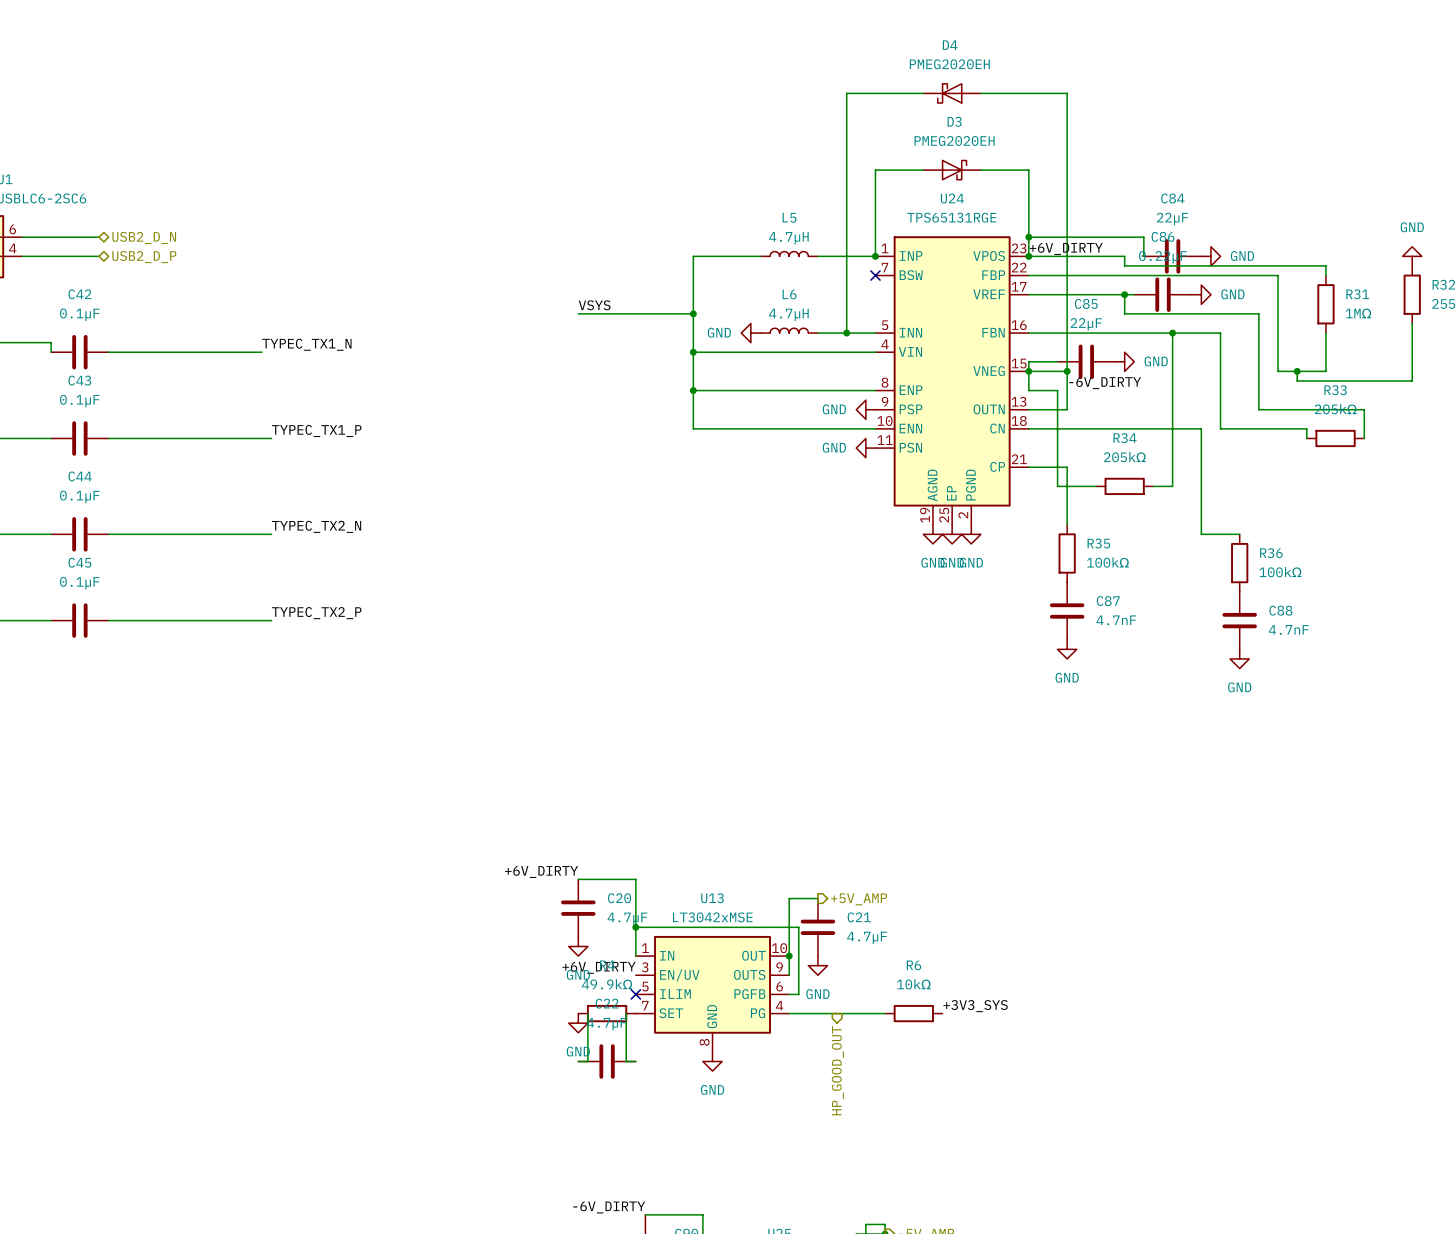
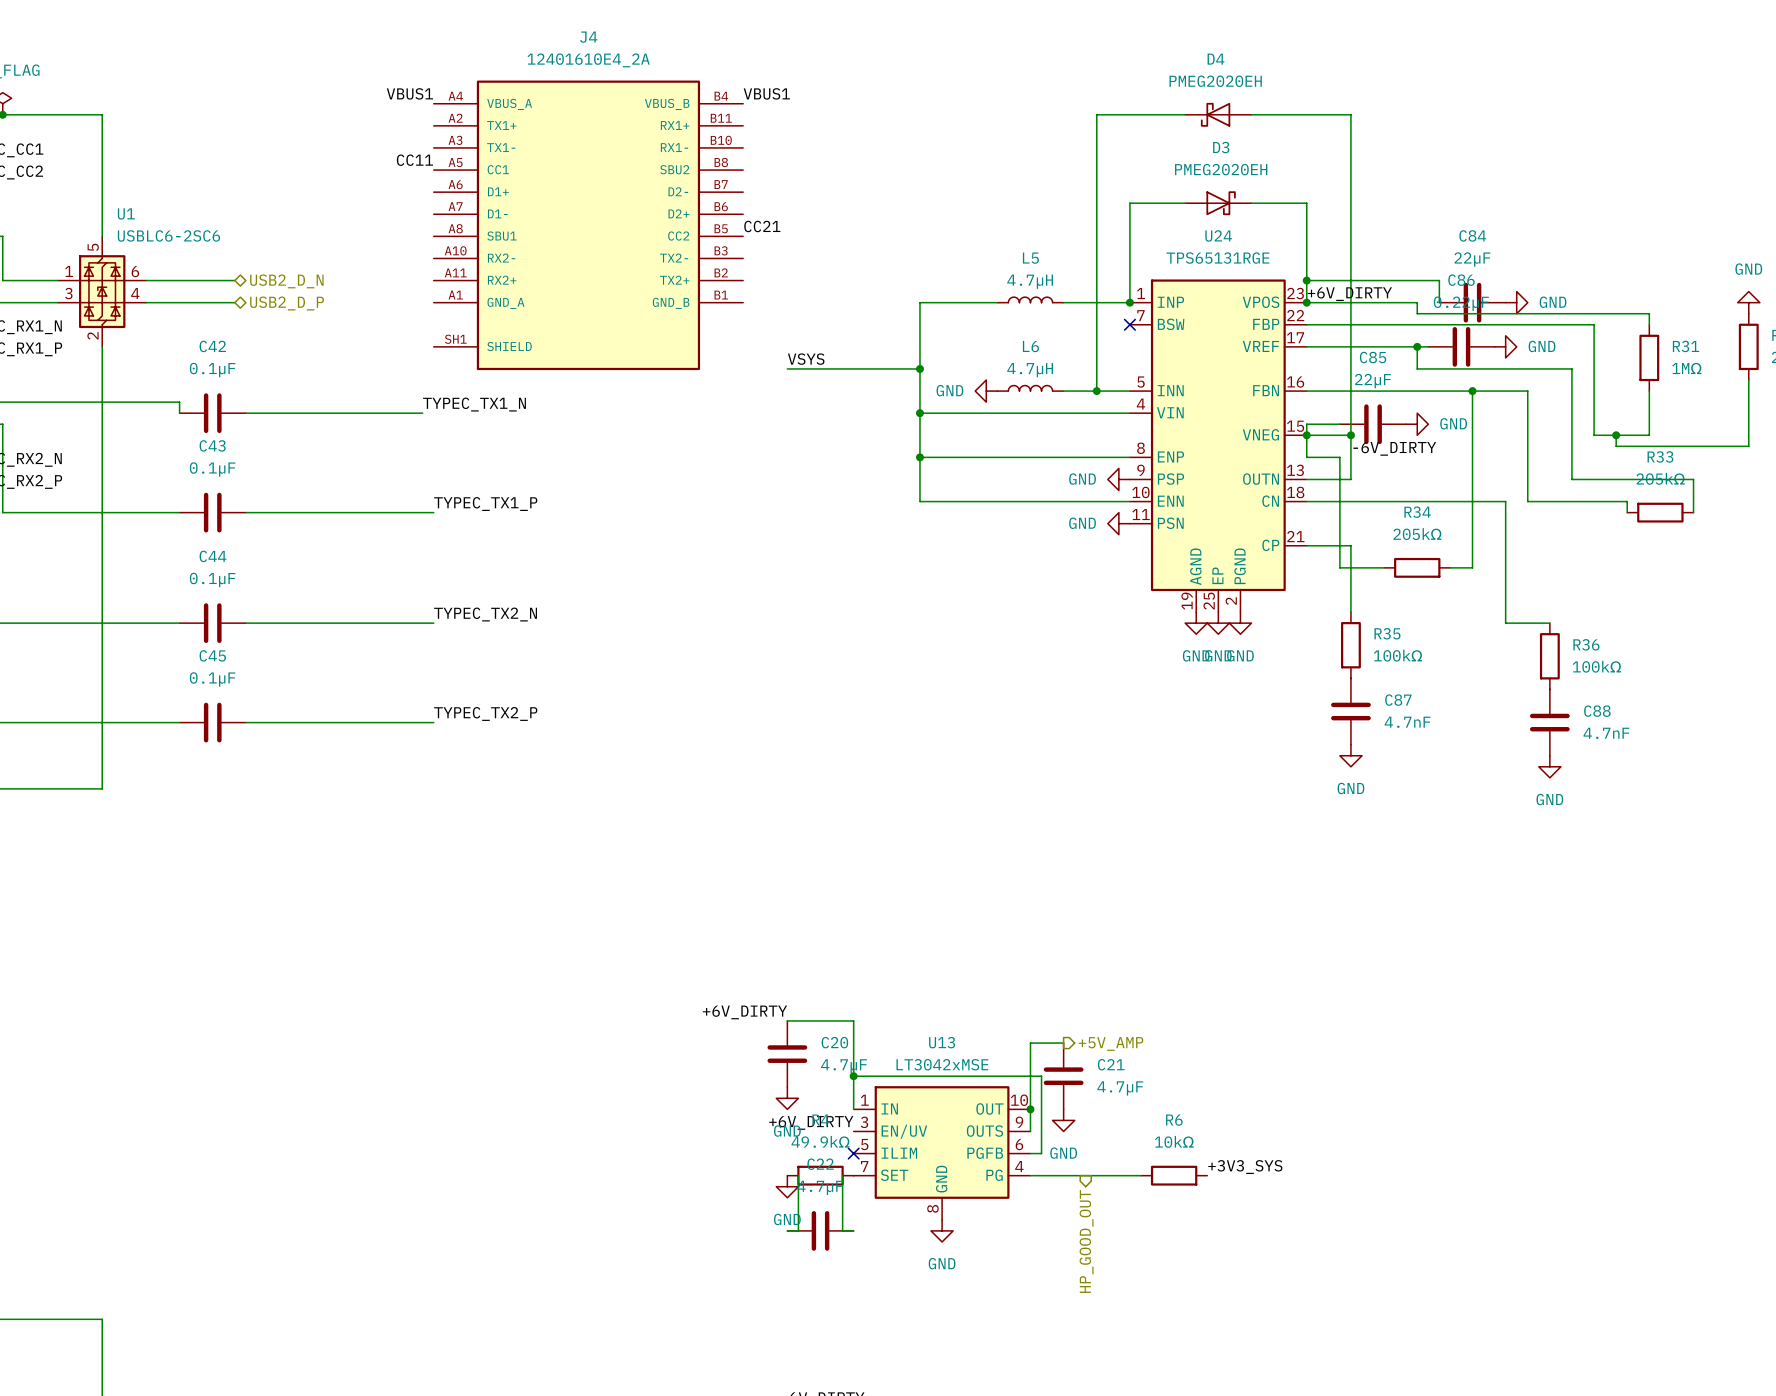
label: none -> VBUS1 (409, 93)
label: none -> VBUS1 (766, 93)
label: none -> CC11 (414, 160)
J4: none -> 12401610E4_2A (588, 225)
label: none -> CC21 (762, 226)

